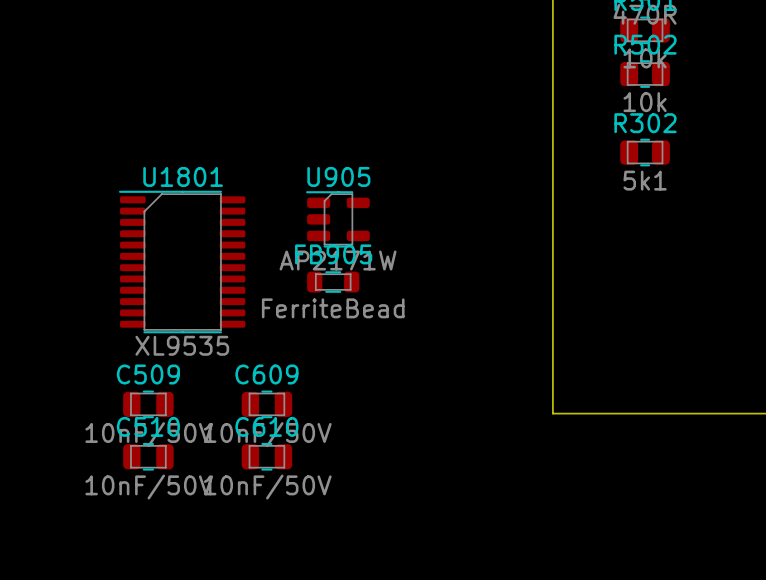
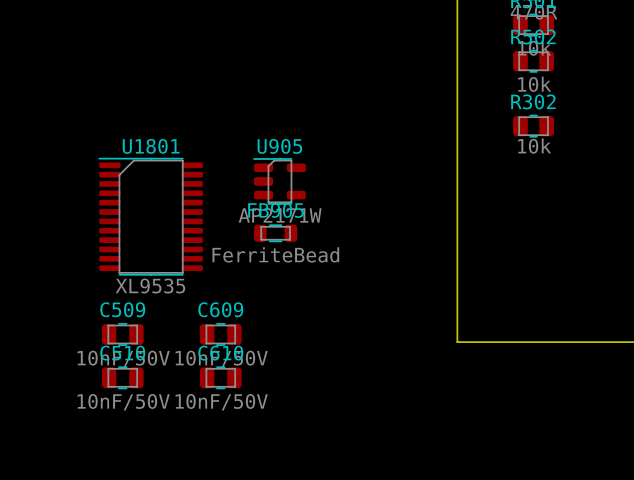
R302 value: 5k1 (645, 180) -> 10k (534, 146)

